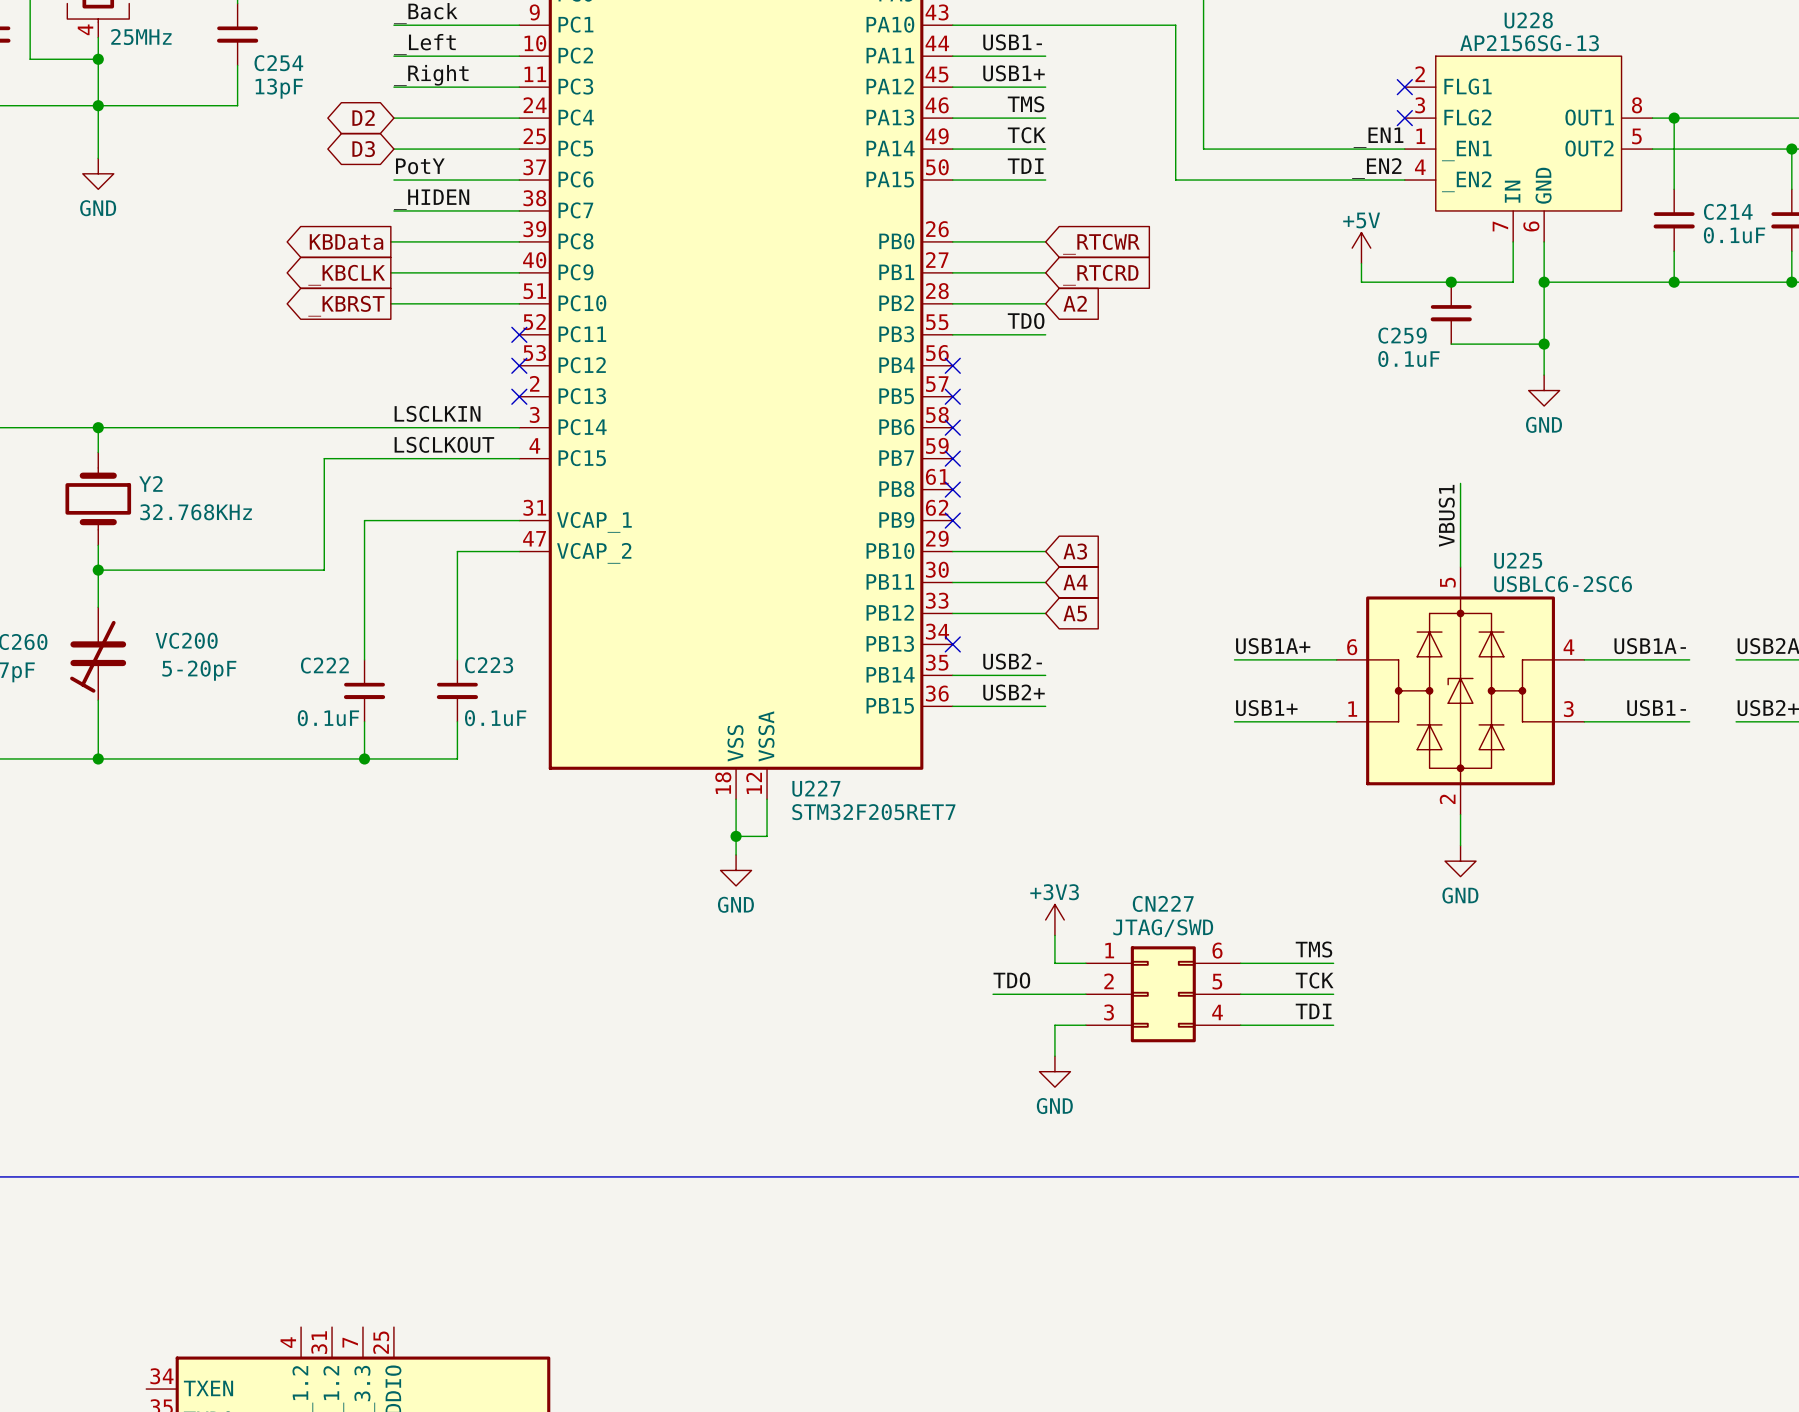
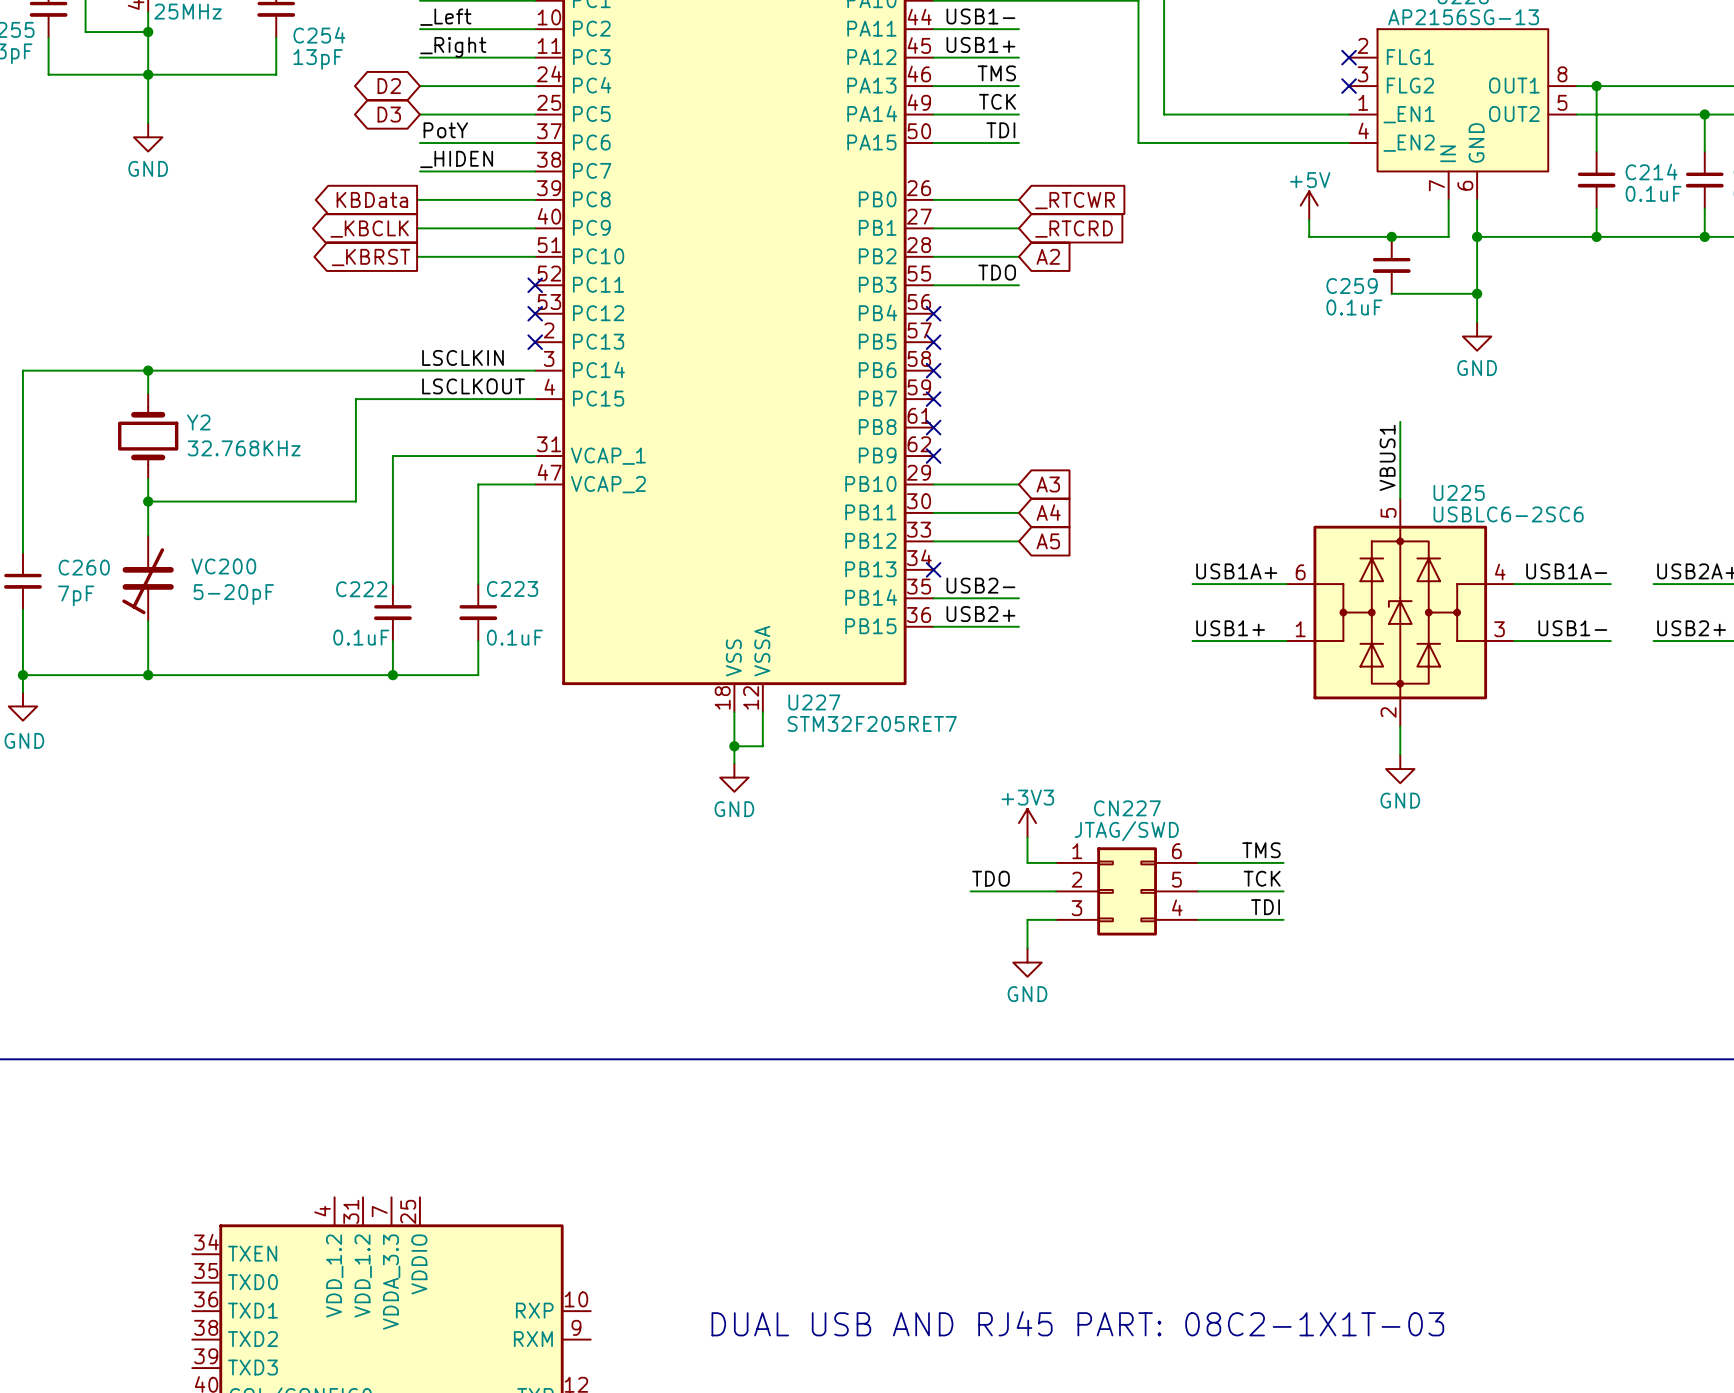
label: _EN1 (1378, 137) -> none
label: _EN2 (1376, 168) -> none

